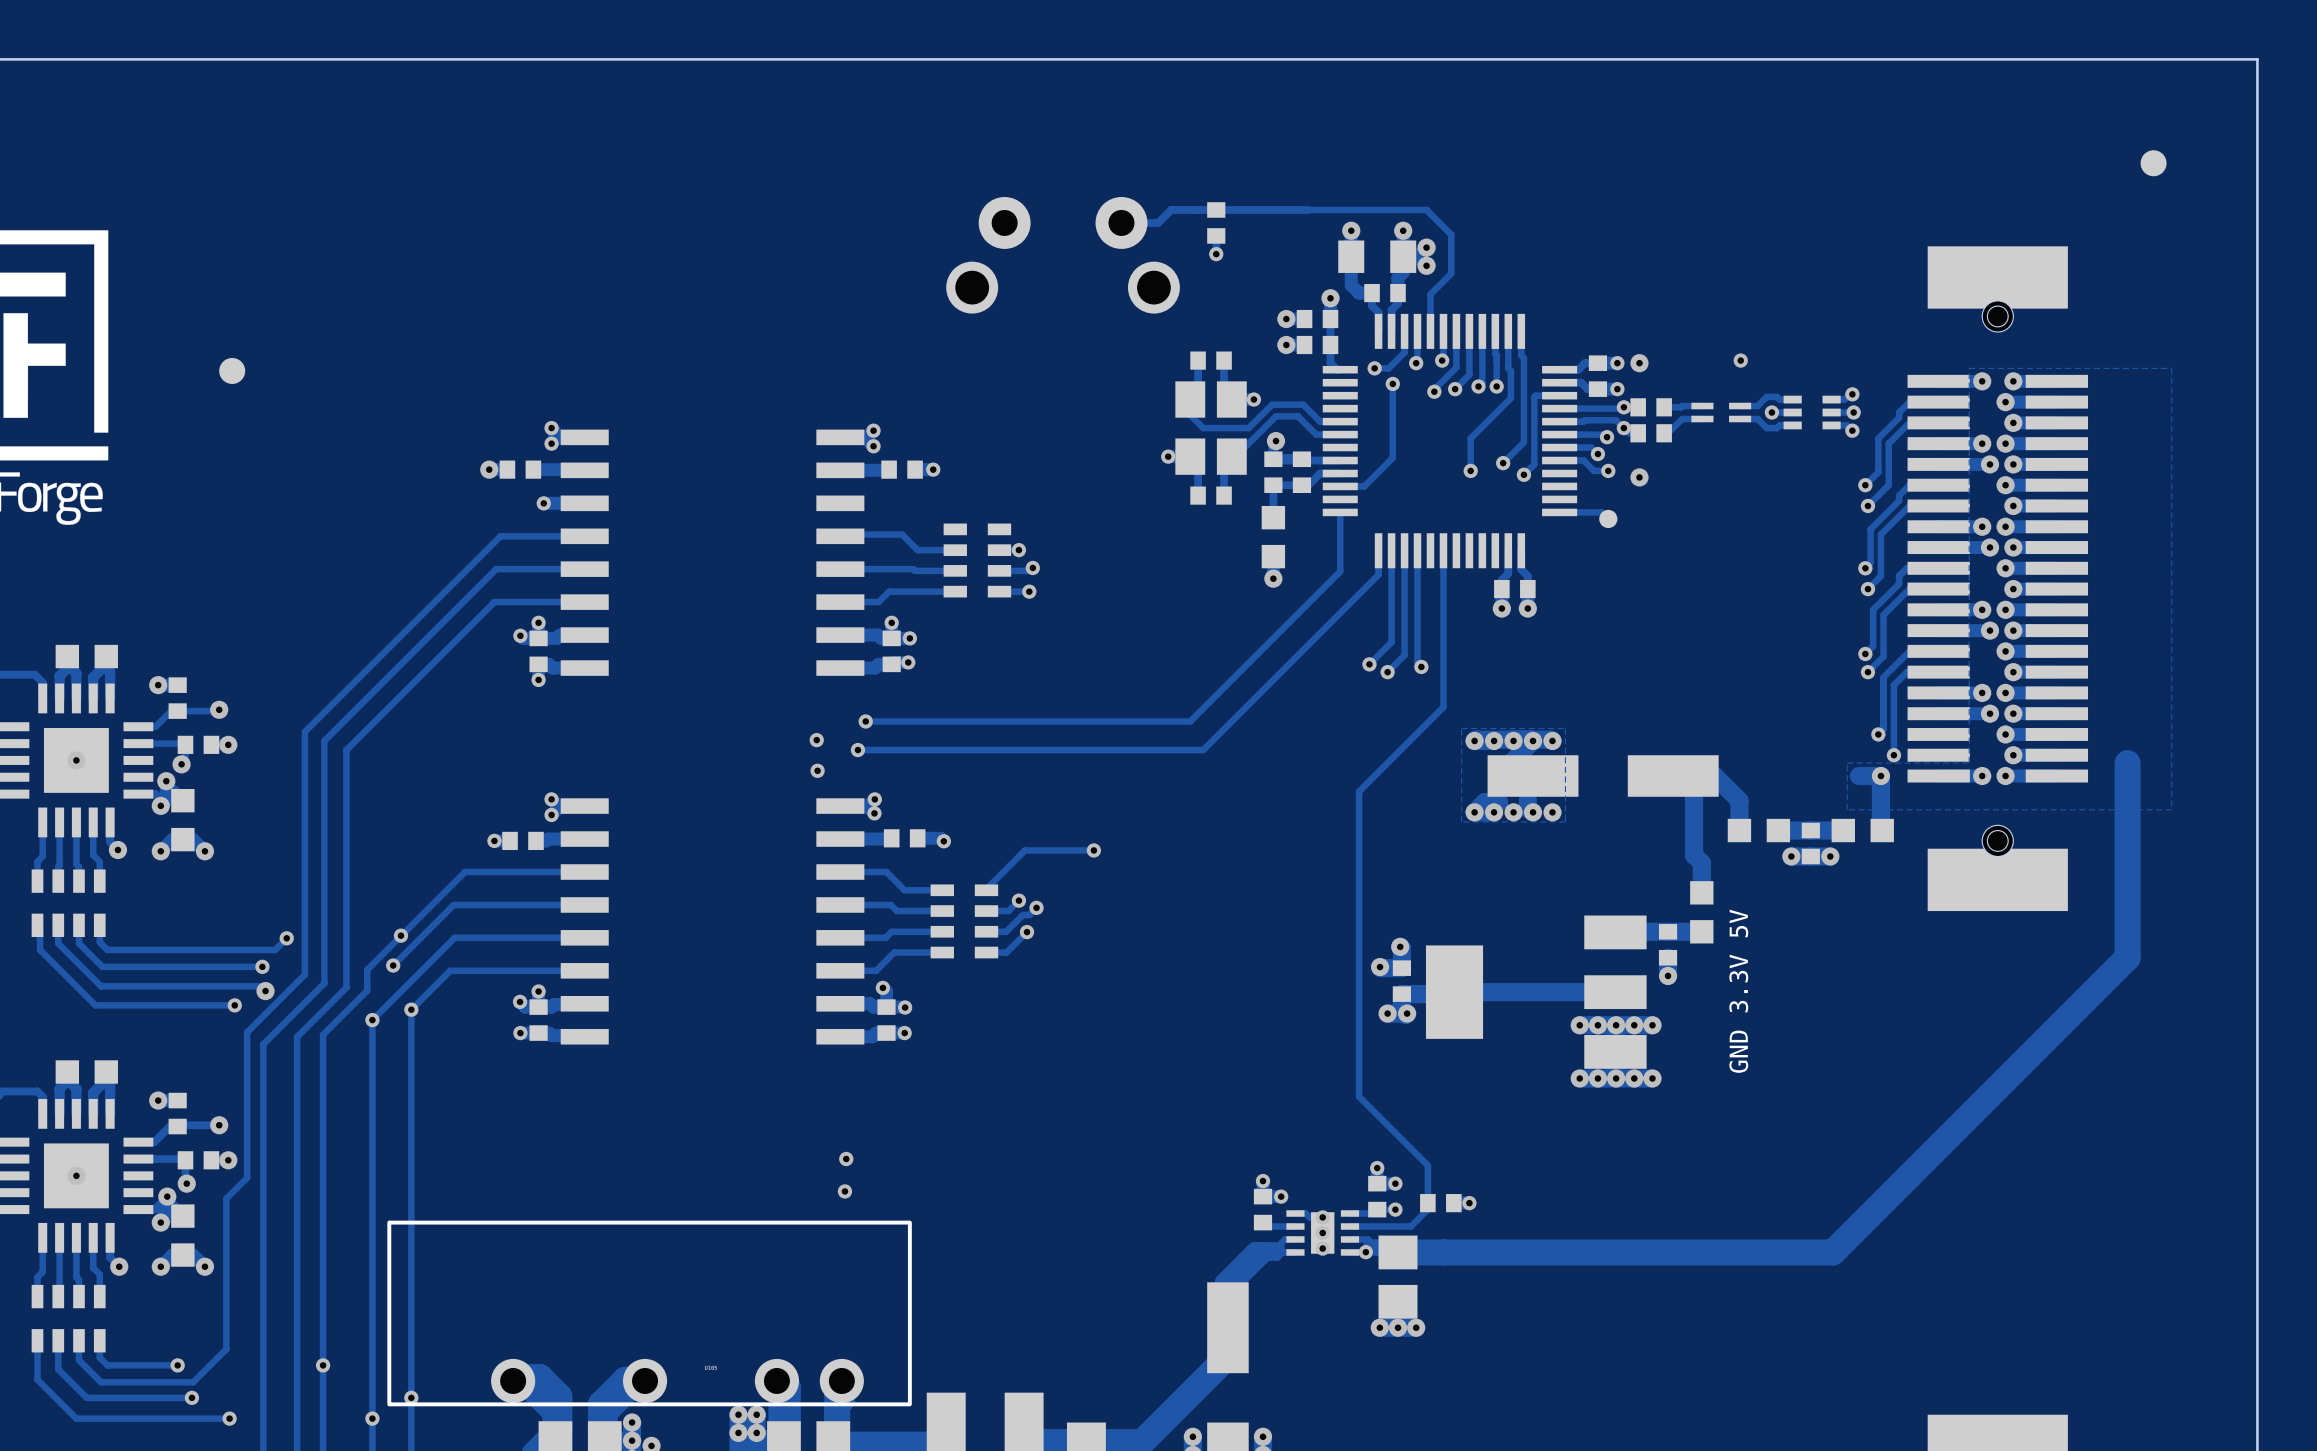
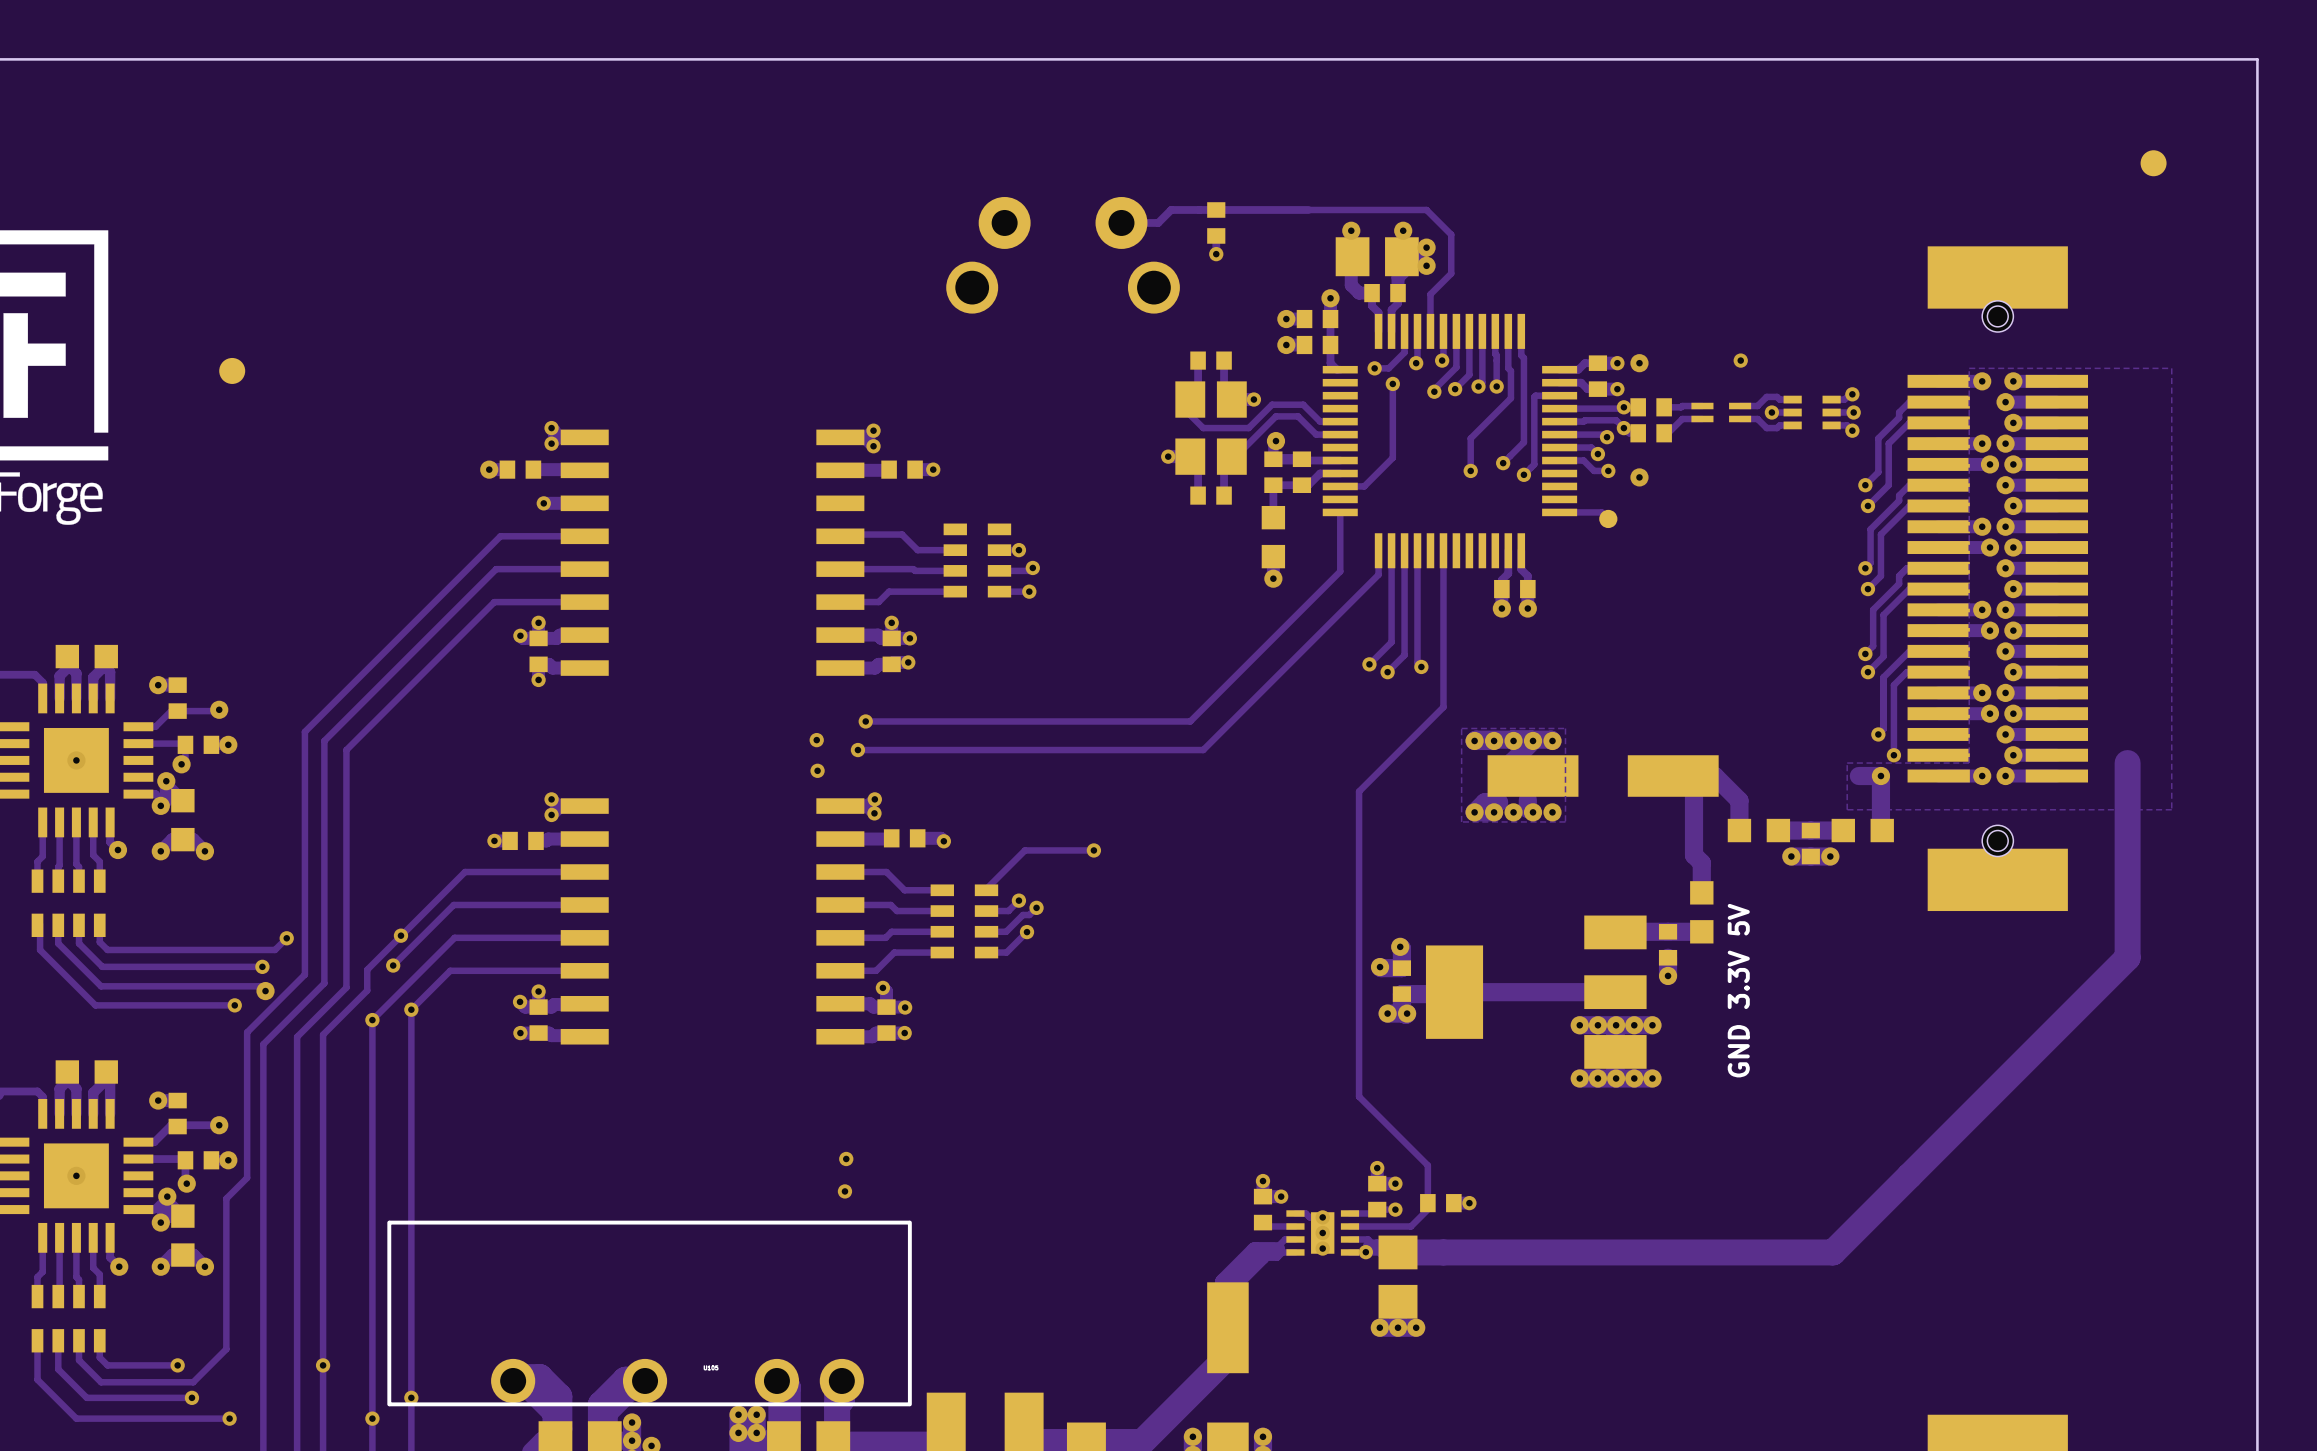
part footprint: [1338, 240, 1417, 273] -> [1335, 237, 1419, 277]

